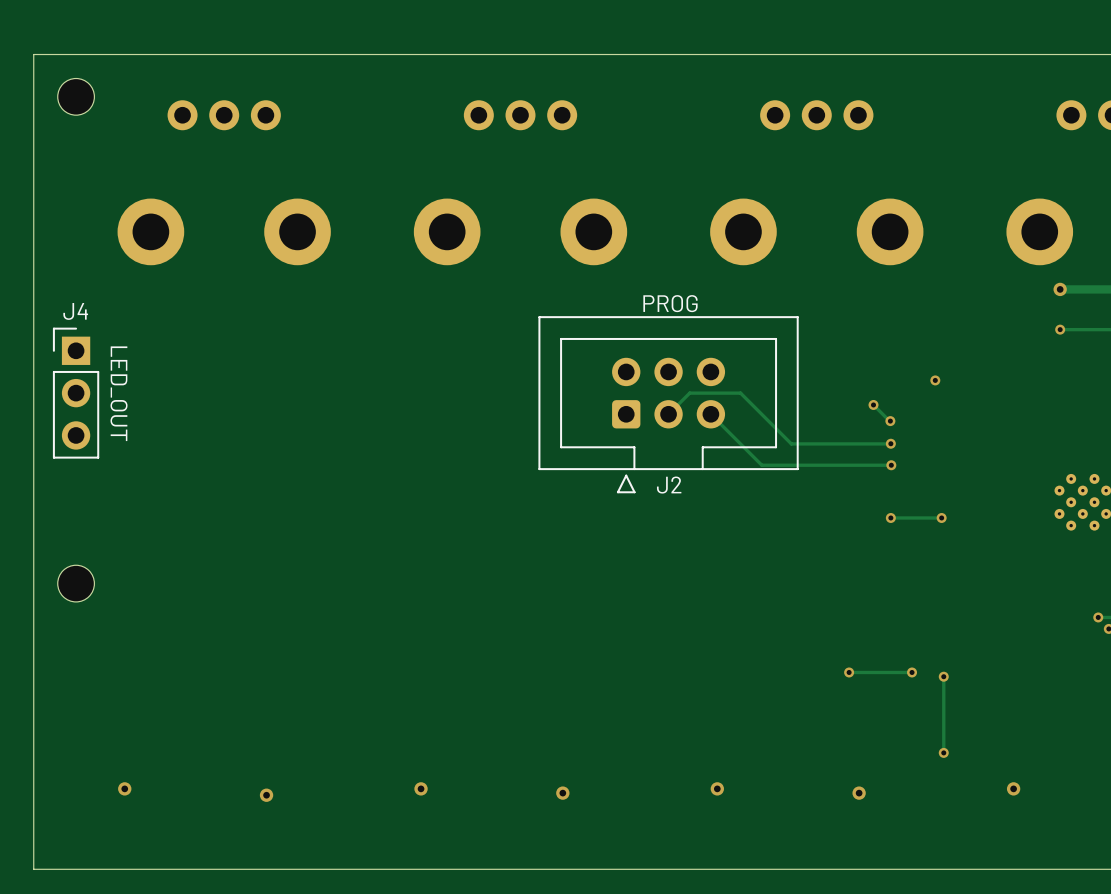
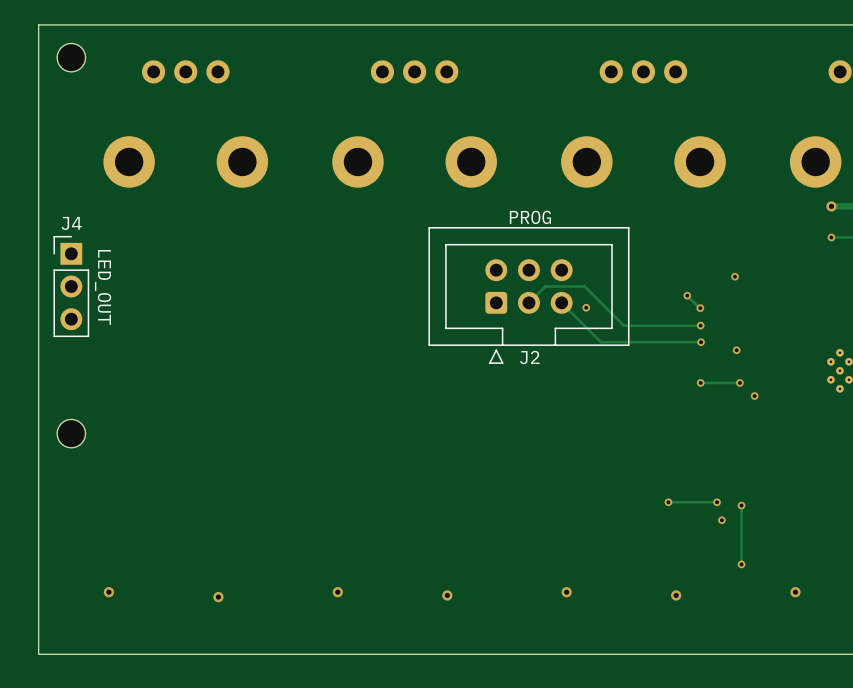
via: none -> (586, 307)
via: none -> (736, 350)
via: none -> (754, 396)
via: none -> (721, 520)

